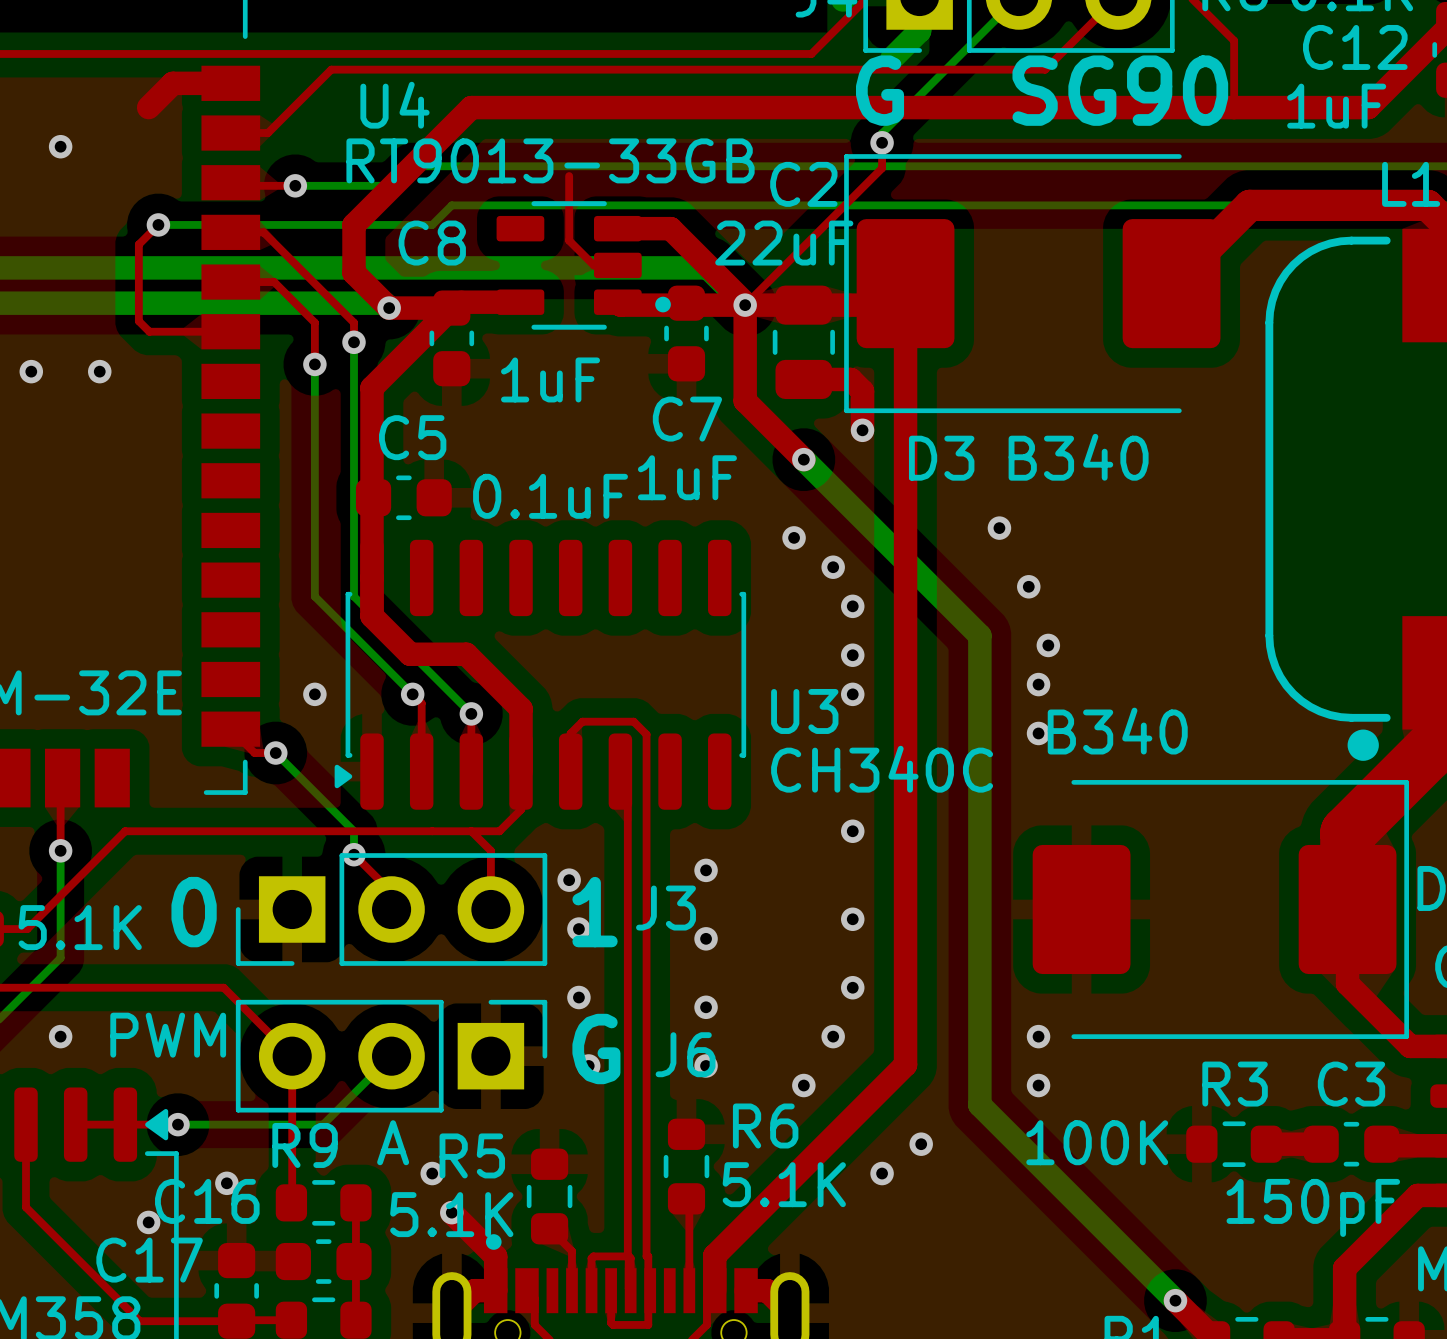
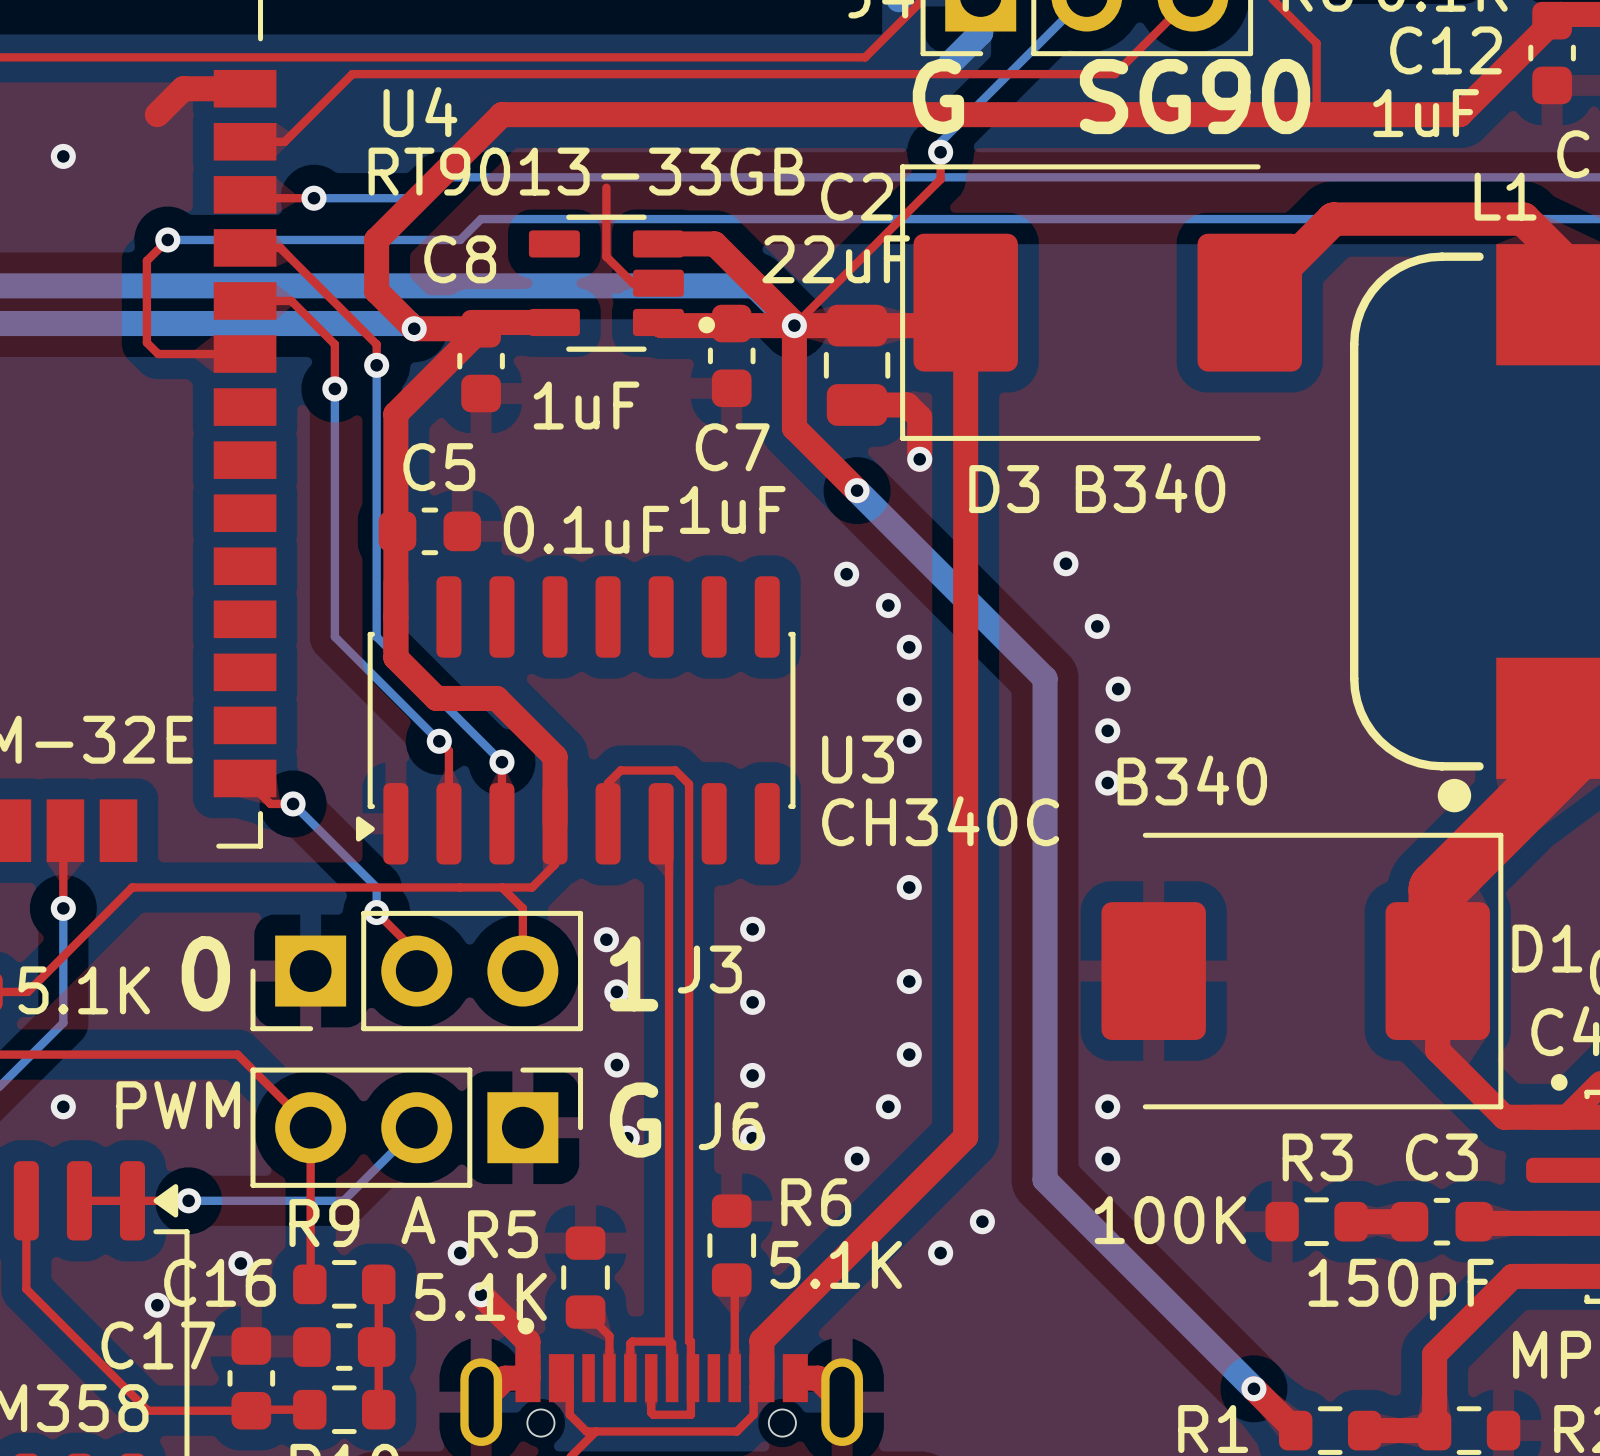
via: (31, 371) -> none
via: (99, 371) -> none
via: (314, 694) -> none

